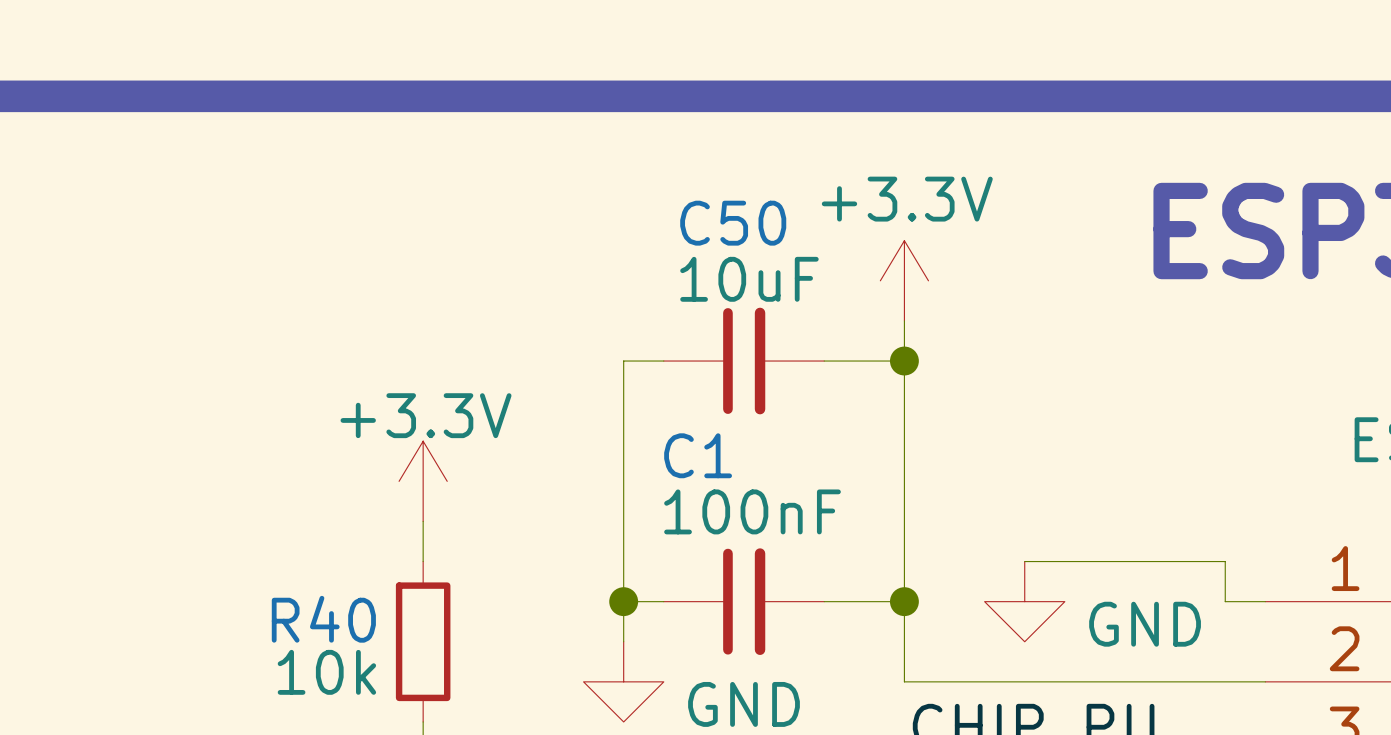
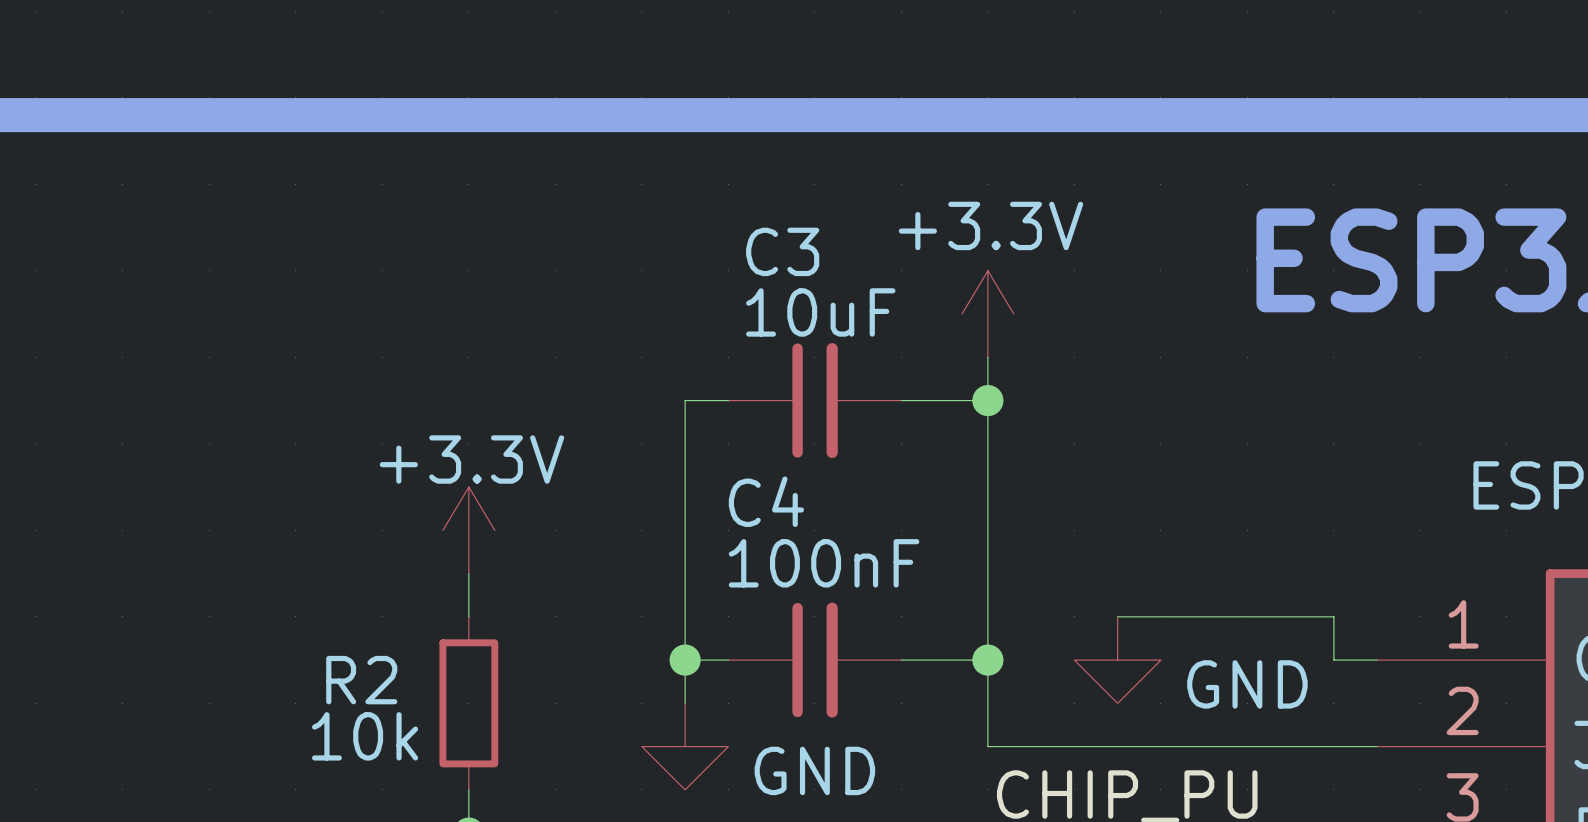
C50 name: C50 (733, 223) -> C3 (782, 251)
C1 name: C1 (698, 455) -> C4 (766, 501)
R40 name: R40 (323, 619) -> R2 (361, 680)

